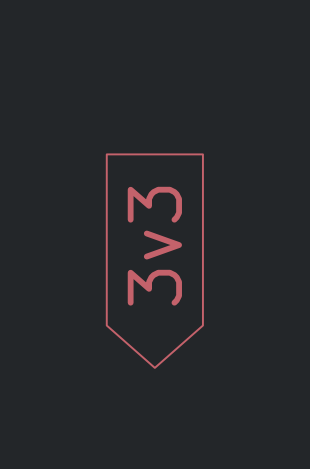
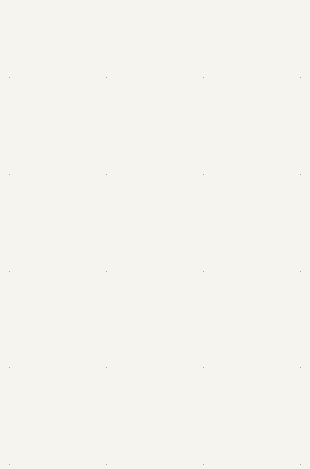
global label: 3v3 (154, 246) -> none

